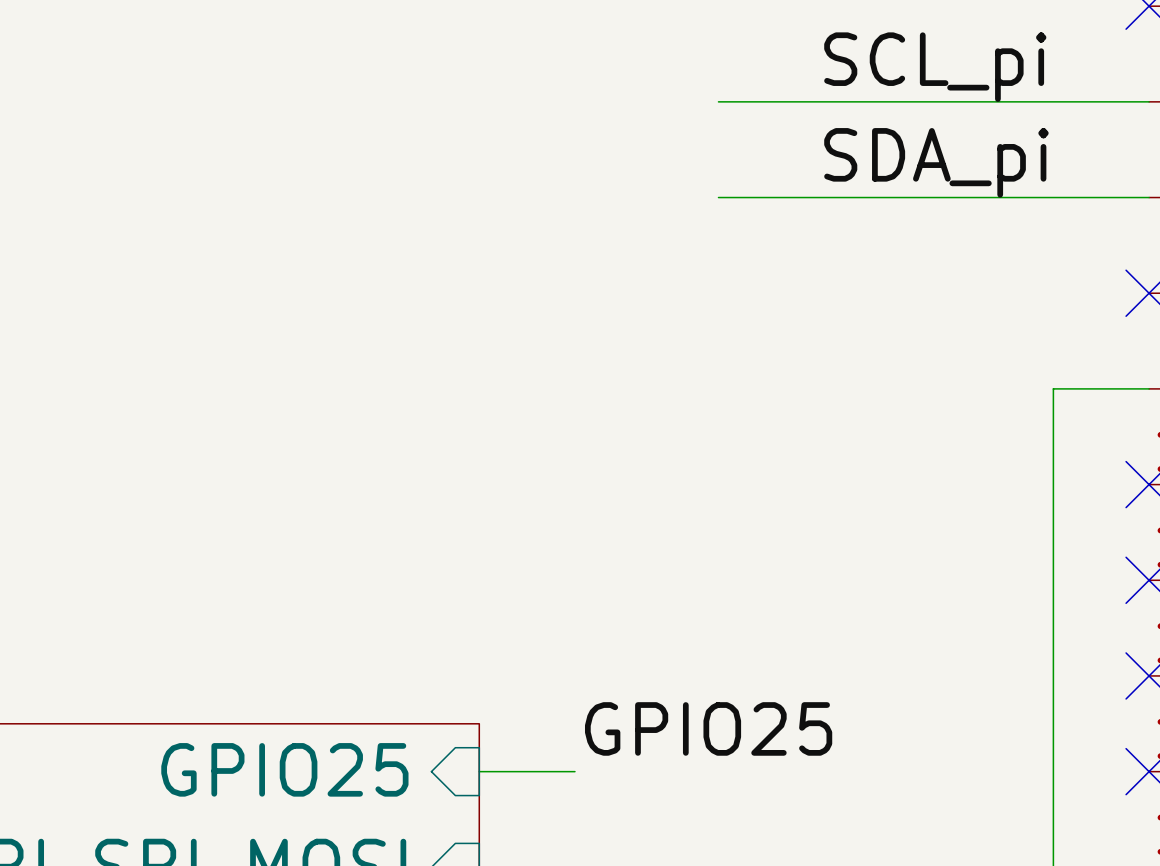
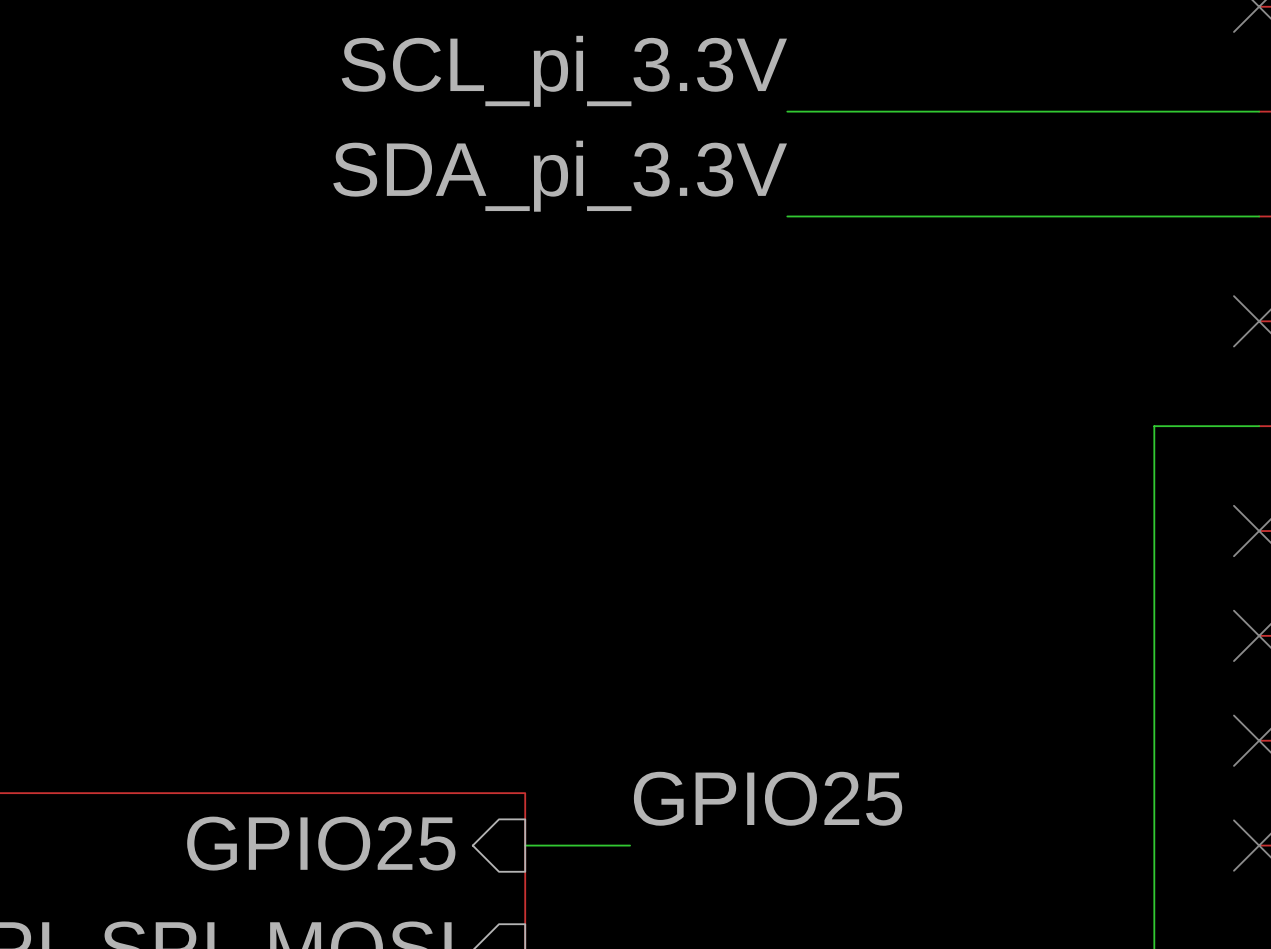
label: none -> SCL_pi_3.3V (564, 71)
label: SCL_pi (935, 67) -> none
label: none -> SDA_pi_3.3V (560, 176)
label: SDA_pi (936, 162) -> none

